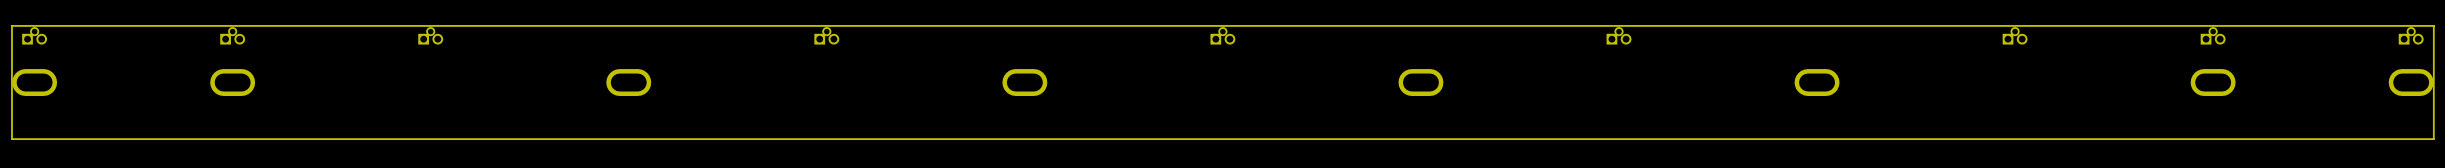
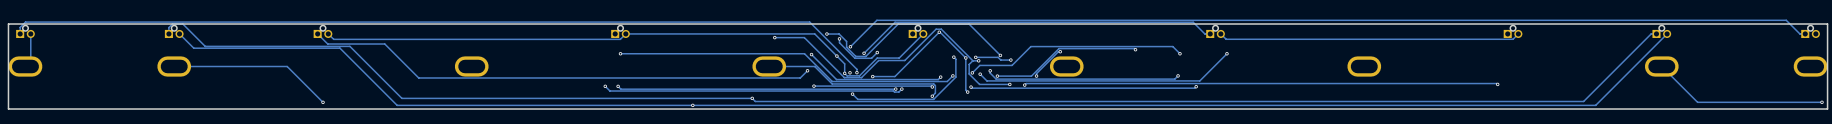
via: none -> (939, 32)
track: none -> (20, 33) (20, 27) (25, 22) (809, 22) (856, 69) (856, 72)
track: none -> (30, 33) (30, 61) (25, 66)
track: none -> (317, 33) (327, 44) (384, 44) (418, 77) (800, 77) (807, 70)
track: none -> (826, 34) (839, 34) (846, 41) (846, 47) (855, 56) (865, 56) (898, 24) (969, 24) (1000, 55)
via: none -> (826, 34)
track: none -> (923, 33) (899, 58) (877, 58) (859, 75) (847, 75) (844, 73) (844, 63) (814, 33) (625, 33) (620, 39) (333, 39) (328, 33)
track: none -> (1210, 33) (1204, 33) (1193, 22) (895, 22) (864, 53)
track: none -> (1518, 33) (1513, 39) (1226, 39) (1220, 33)
track: none -> (1656, 33) (1651, 33) (1583, 101) (755, 101) (752, 98) (401, 98) (349, 46) (205, 46) (182, 24) (172, 24) (168, 27) (168, 33)
track: none -> (1667, 33) (1595, 105) (397, 105) (339, 48) (193, 48) (179, 33)
track: none -> (1805, 33) (1799, 33) (1786, 20) (876, 20) (850, 46)
track: none -> (774, 37) (804, 37) (844, 77) (861, 77) (878, 60) (904, 60) (936, 29) (941, 29) (972, 60)
via: none -> (774, 37)
track: none -> (839, 38) (839, 42) (854, 58) (871, 58) (877, 52)
via: none -> (839, 38)
via: none -> (850, 46)
track: none -> (1135, 49) (1058, 48) (1031, 76) (997, 76)
via: none -> (1135, 49)
track: none -> (1060, 51) (1036, 73) (1036, 76)
via: none -> (1060, 51)
via: none -> (877, 52)
via: none -> (864, 53)
track: none -> (620, 53) (804, 53) (832, 81) (947, 81) (952, 75)
via: none -> (620, 53)
track: none -> (1179, 53) (1172, 46) (1030, 46) (1012, 65) (979, 65) (972, 72)
via: none -> (1179, 53)
track: none -> (1226, 53) (1199, 80) (986, 80) (980, 74)
via: none -> (1226, 53)
track: none -> (811, 54) (836, 79) (938, 79) (940, 77)
via: none -> (811, 54)
via: none -> (1000, 55)
via: none -> (836, 56)
track: none -> (953, 57) (955, 59) (955, 77) (933, 99) (857, 99) (852, 94)
via: none -> (953, 57)
track: none -> (975, 57) (998, 57) (1000, 60) (1010, 60)
via: none -> (975, 57)
via: none -> (965, 57)
via: none -> (1010, 60)
track: none -> (972, 60) (969, 64) (969, 74) (979, 84) (1009, 84)
track: none -> (978, 60) (972, 60)
via: none -> (978, 60)
track: none -> (174, 66) (287, 66) (323, 102)
track: none -> (769, 66) (814, 66) (832, 83) (933, 83) (935, 93) (932, 96)
track: none -> (1661, 66) (1697, 102) (1821, 102)
via: none -> (807, 70)
track: none -> (990, 70) (996, 79) (1174, 79) (1178, 75)
via: none -> (990, 70)
via: none -> (849, 72)
via: none -> (856, 72)
via: none -> (844, 73)
via: none -> (972, 72)
via: none -> (980, 74)
track: none -> (872, 76) (894, 76) (940, 32) (965, 57) (965, 90) (967, 92)
via: none -> (872, 76)
via: none -> (952, 75)
via: none -> (997, 76)
via: none -> (1036, 76)
via: none -> (1178, 75)
via: none -> (940, 77)
via: none -> (1009, 84)
track: none -> (1497, 84) (1026, 83) (1024, 85)
via: none -> (1497, 84)
via: none -> (1024, 85)
track: none -> (605, 86) (609, 91) (898, 92) (901, 89)
via: none -> (605, 86)
track: none -> (618, 86) (620, 89) (895, 89)
via: none -> (618, 86)
track: none -> (814, 86) (932, 87)
via: none -> (813, 86)
via: none -> (932, 87)
via: none -> (971, 87)
track: none -> (1196, 86) (971, 87)
via: none -> (1196, 86)
via: none -> (895, 89)
via: none -> (901, 89)
via: none -> (967, 92)
via: none -> (852, 94)
via: none -> (932, 96)
via: none -> (752, 98)
via: none -> (323, 102)
via: none -> (1821, 102)
via: none -> (692, 105)

